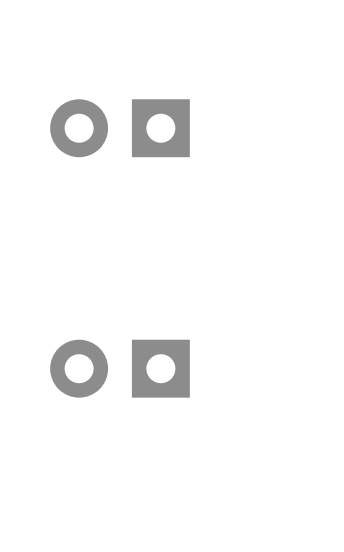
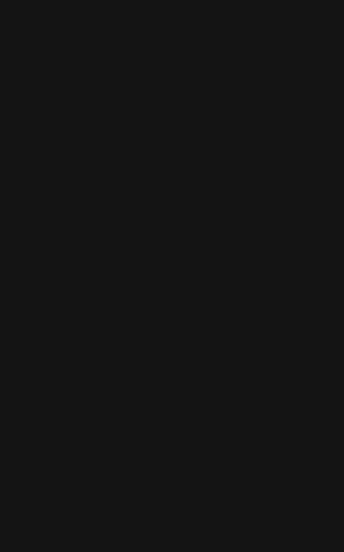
part: (119, 128) -> none
part: (119, 368) -> none

